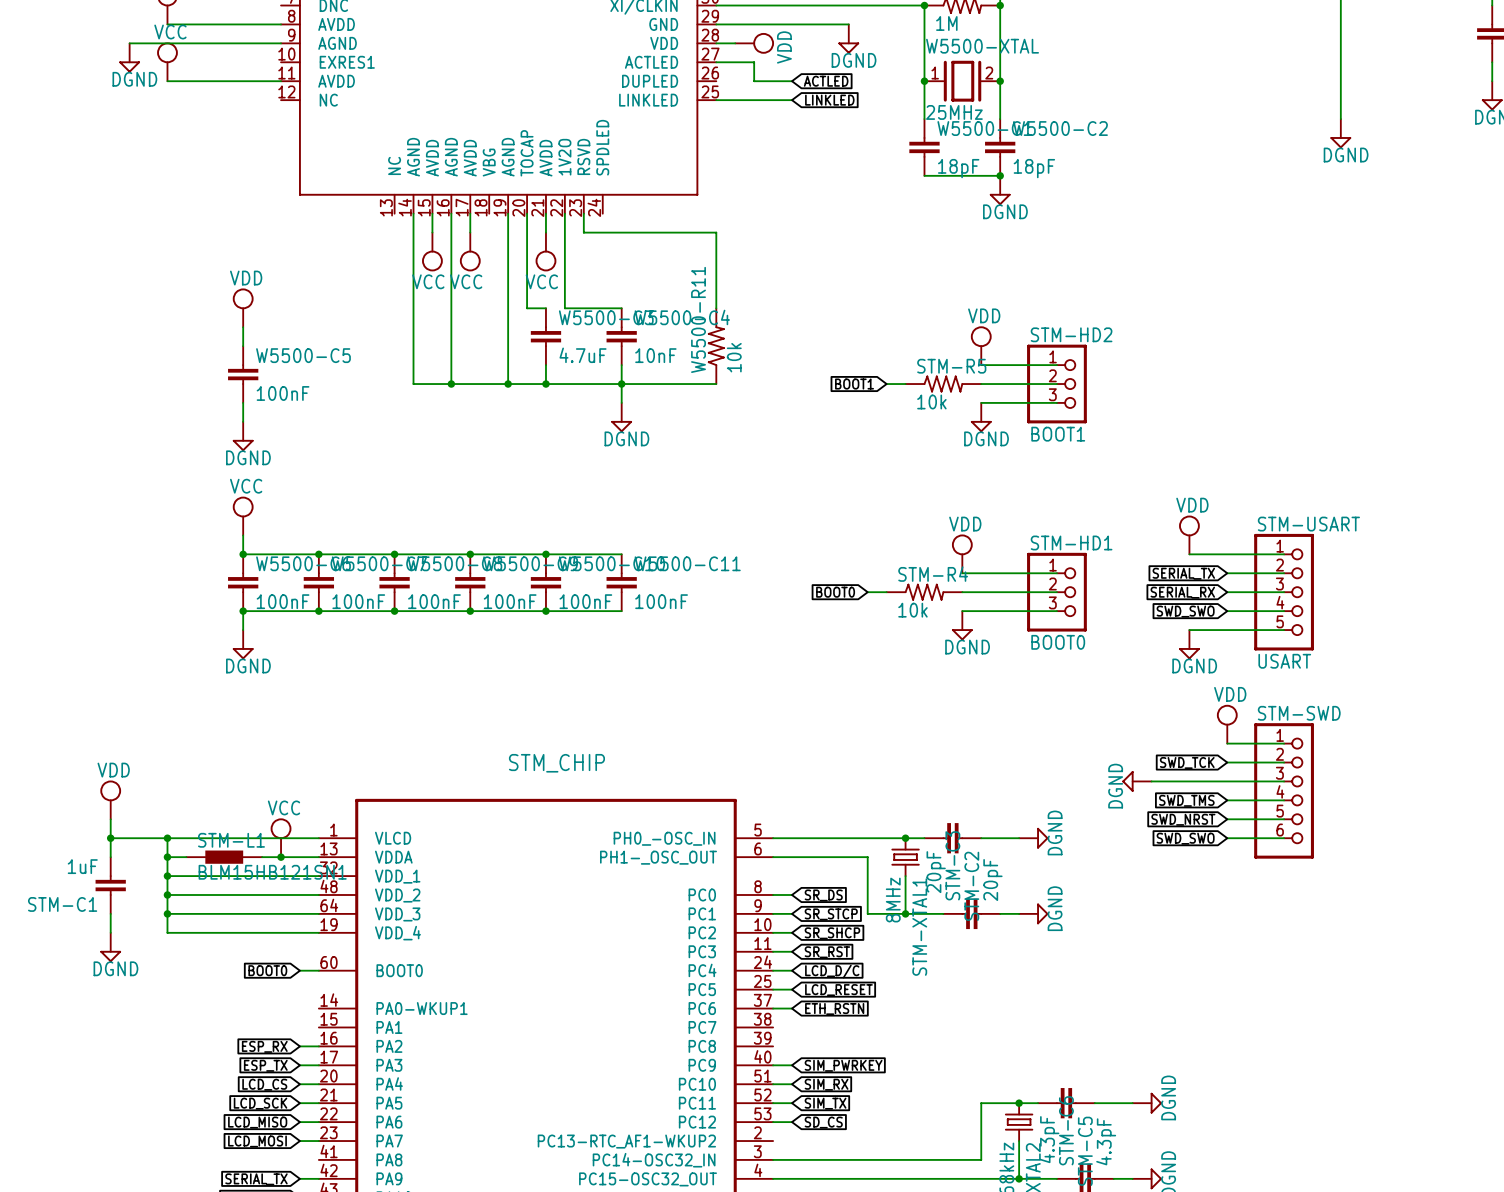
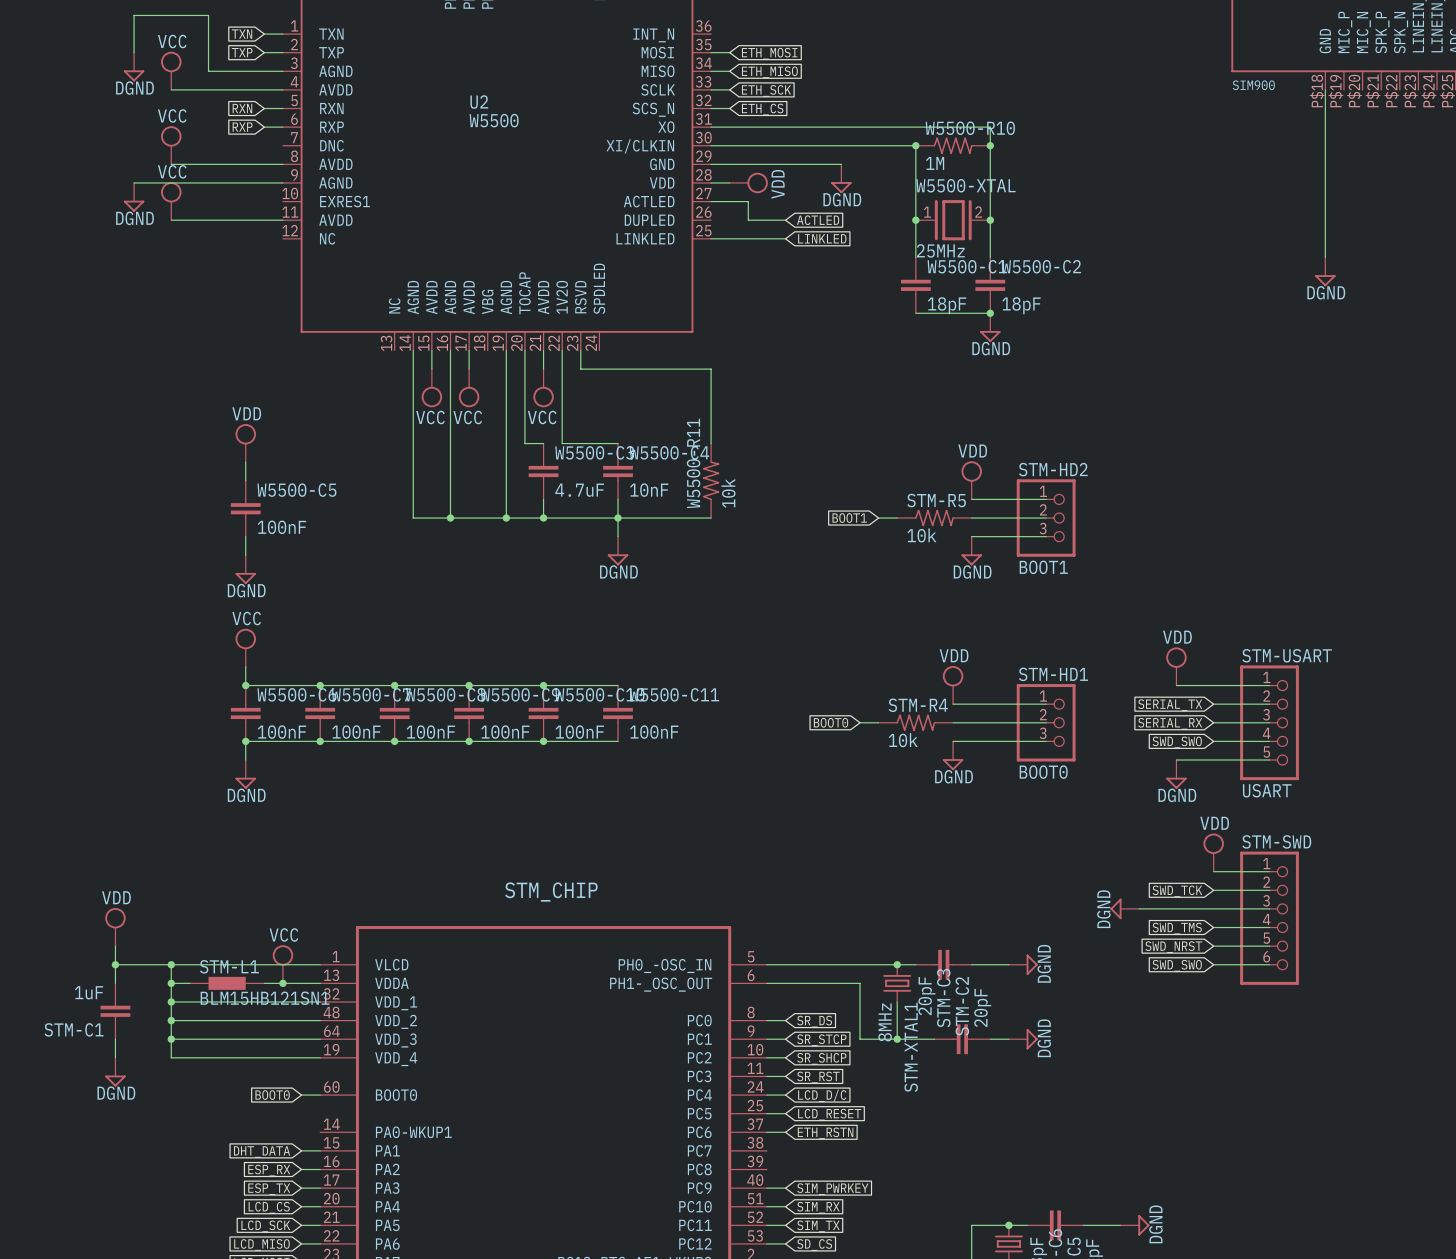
global label: none -> DHT_DATA (262, 1152)
wire: none -> (301, 1150) (320, 1150)

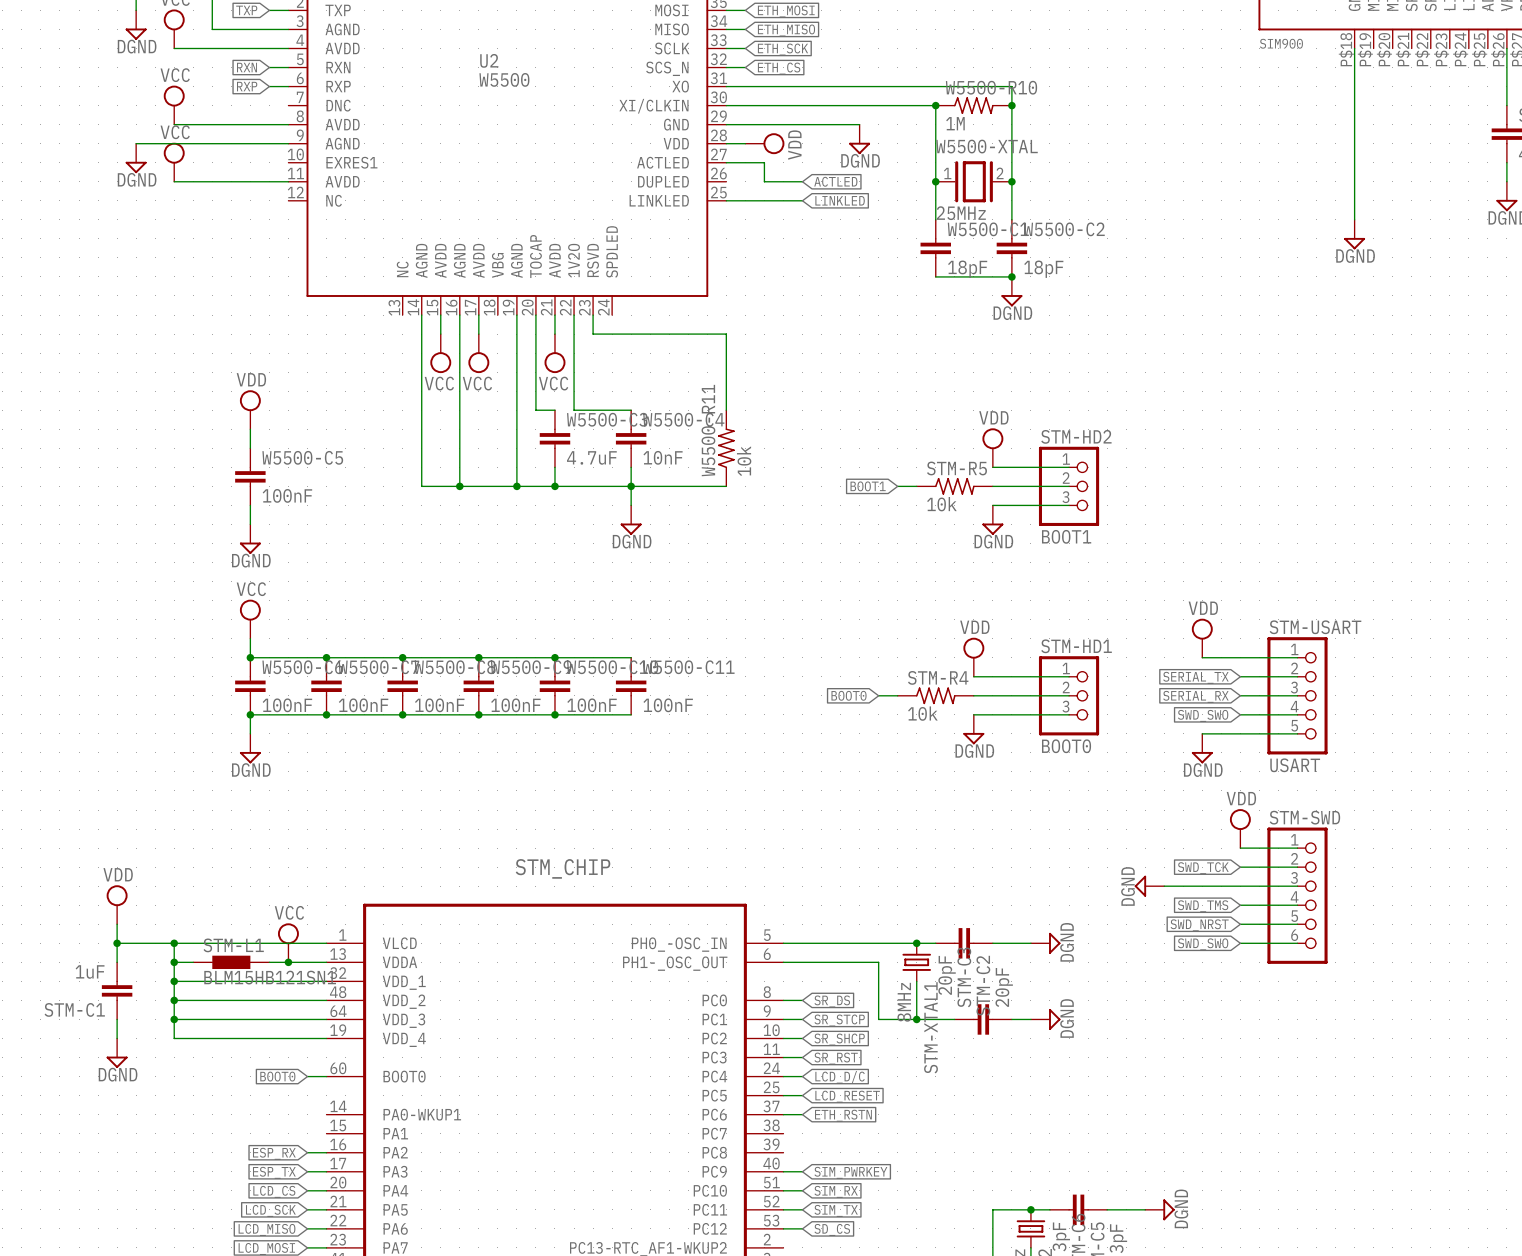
wire: (301, 1150) (320, 1150) -> none
global label: DHT_DATA (262, 1152) -> none

